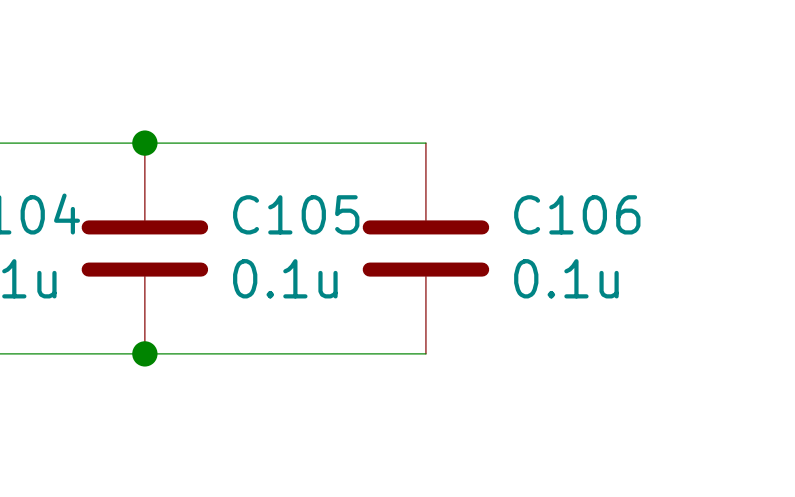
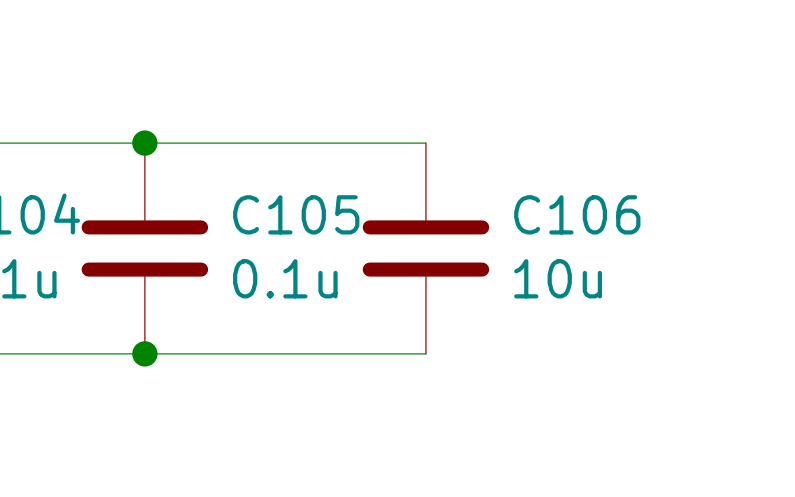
C106 value: 0.1u (566, 278) -> 10u (558, 278)

